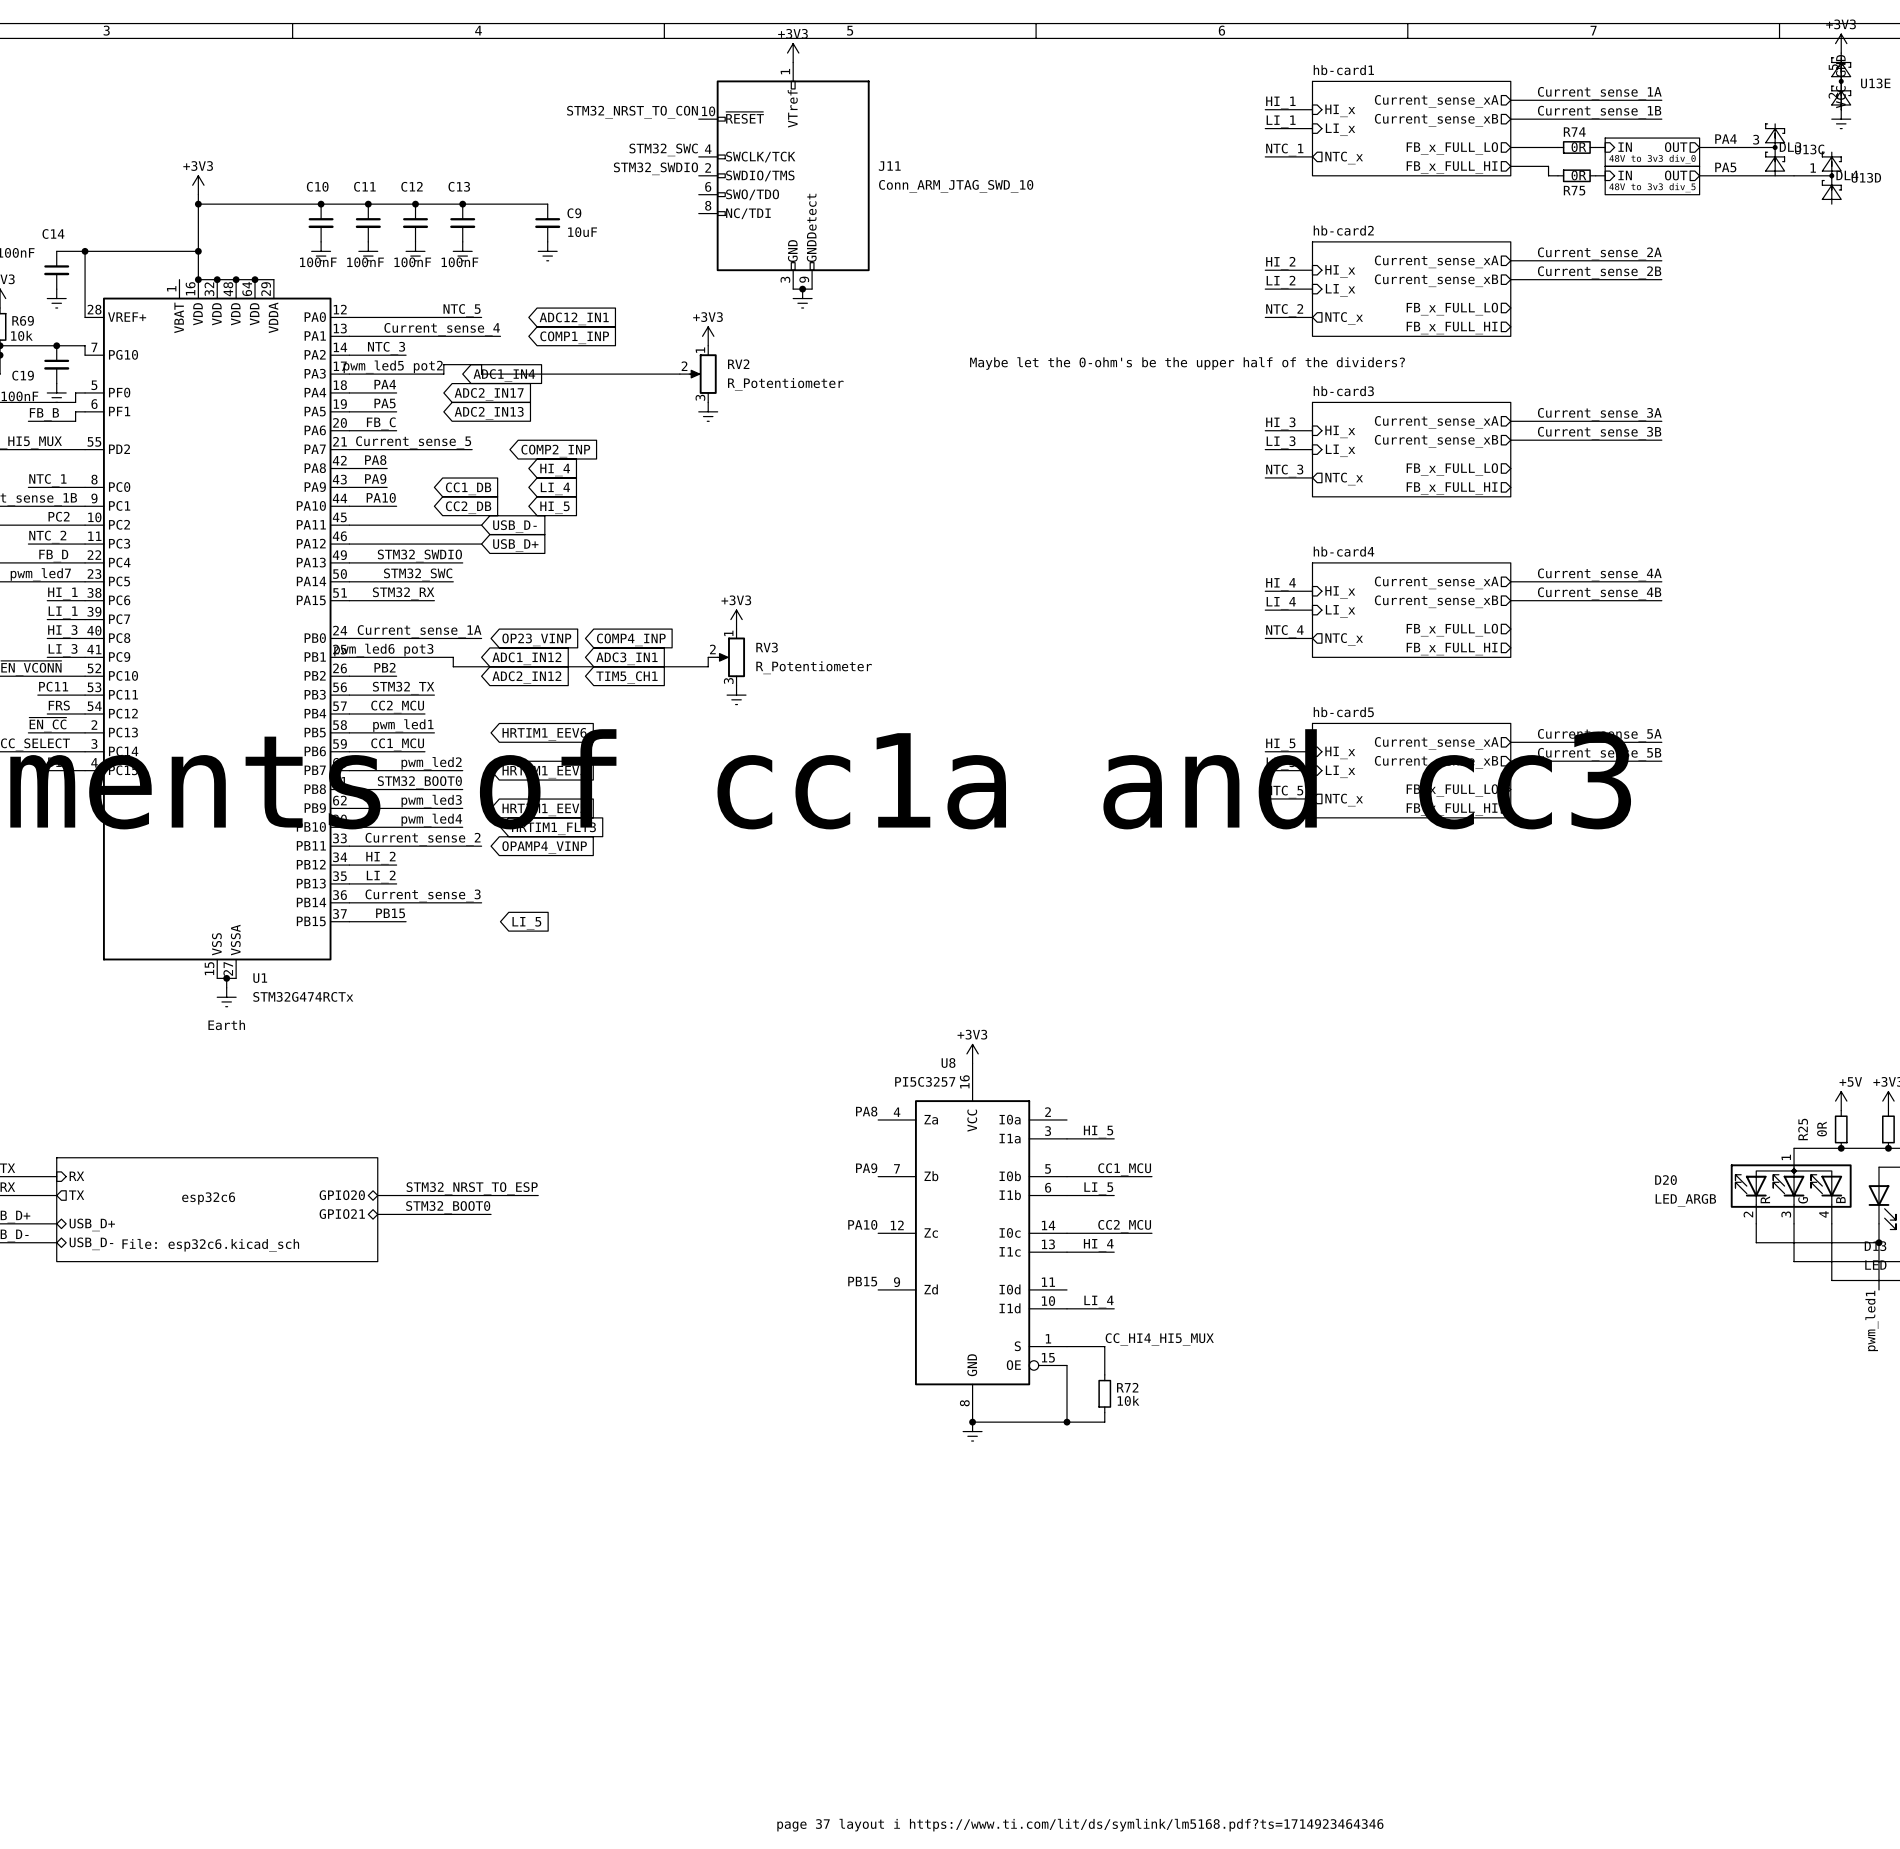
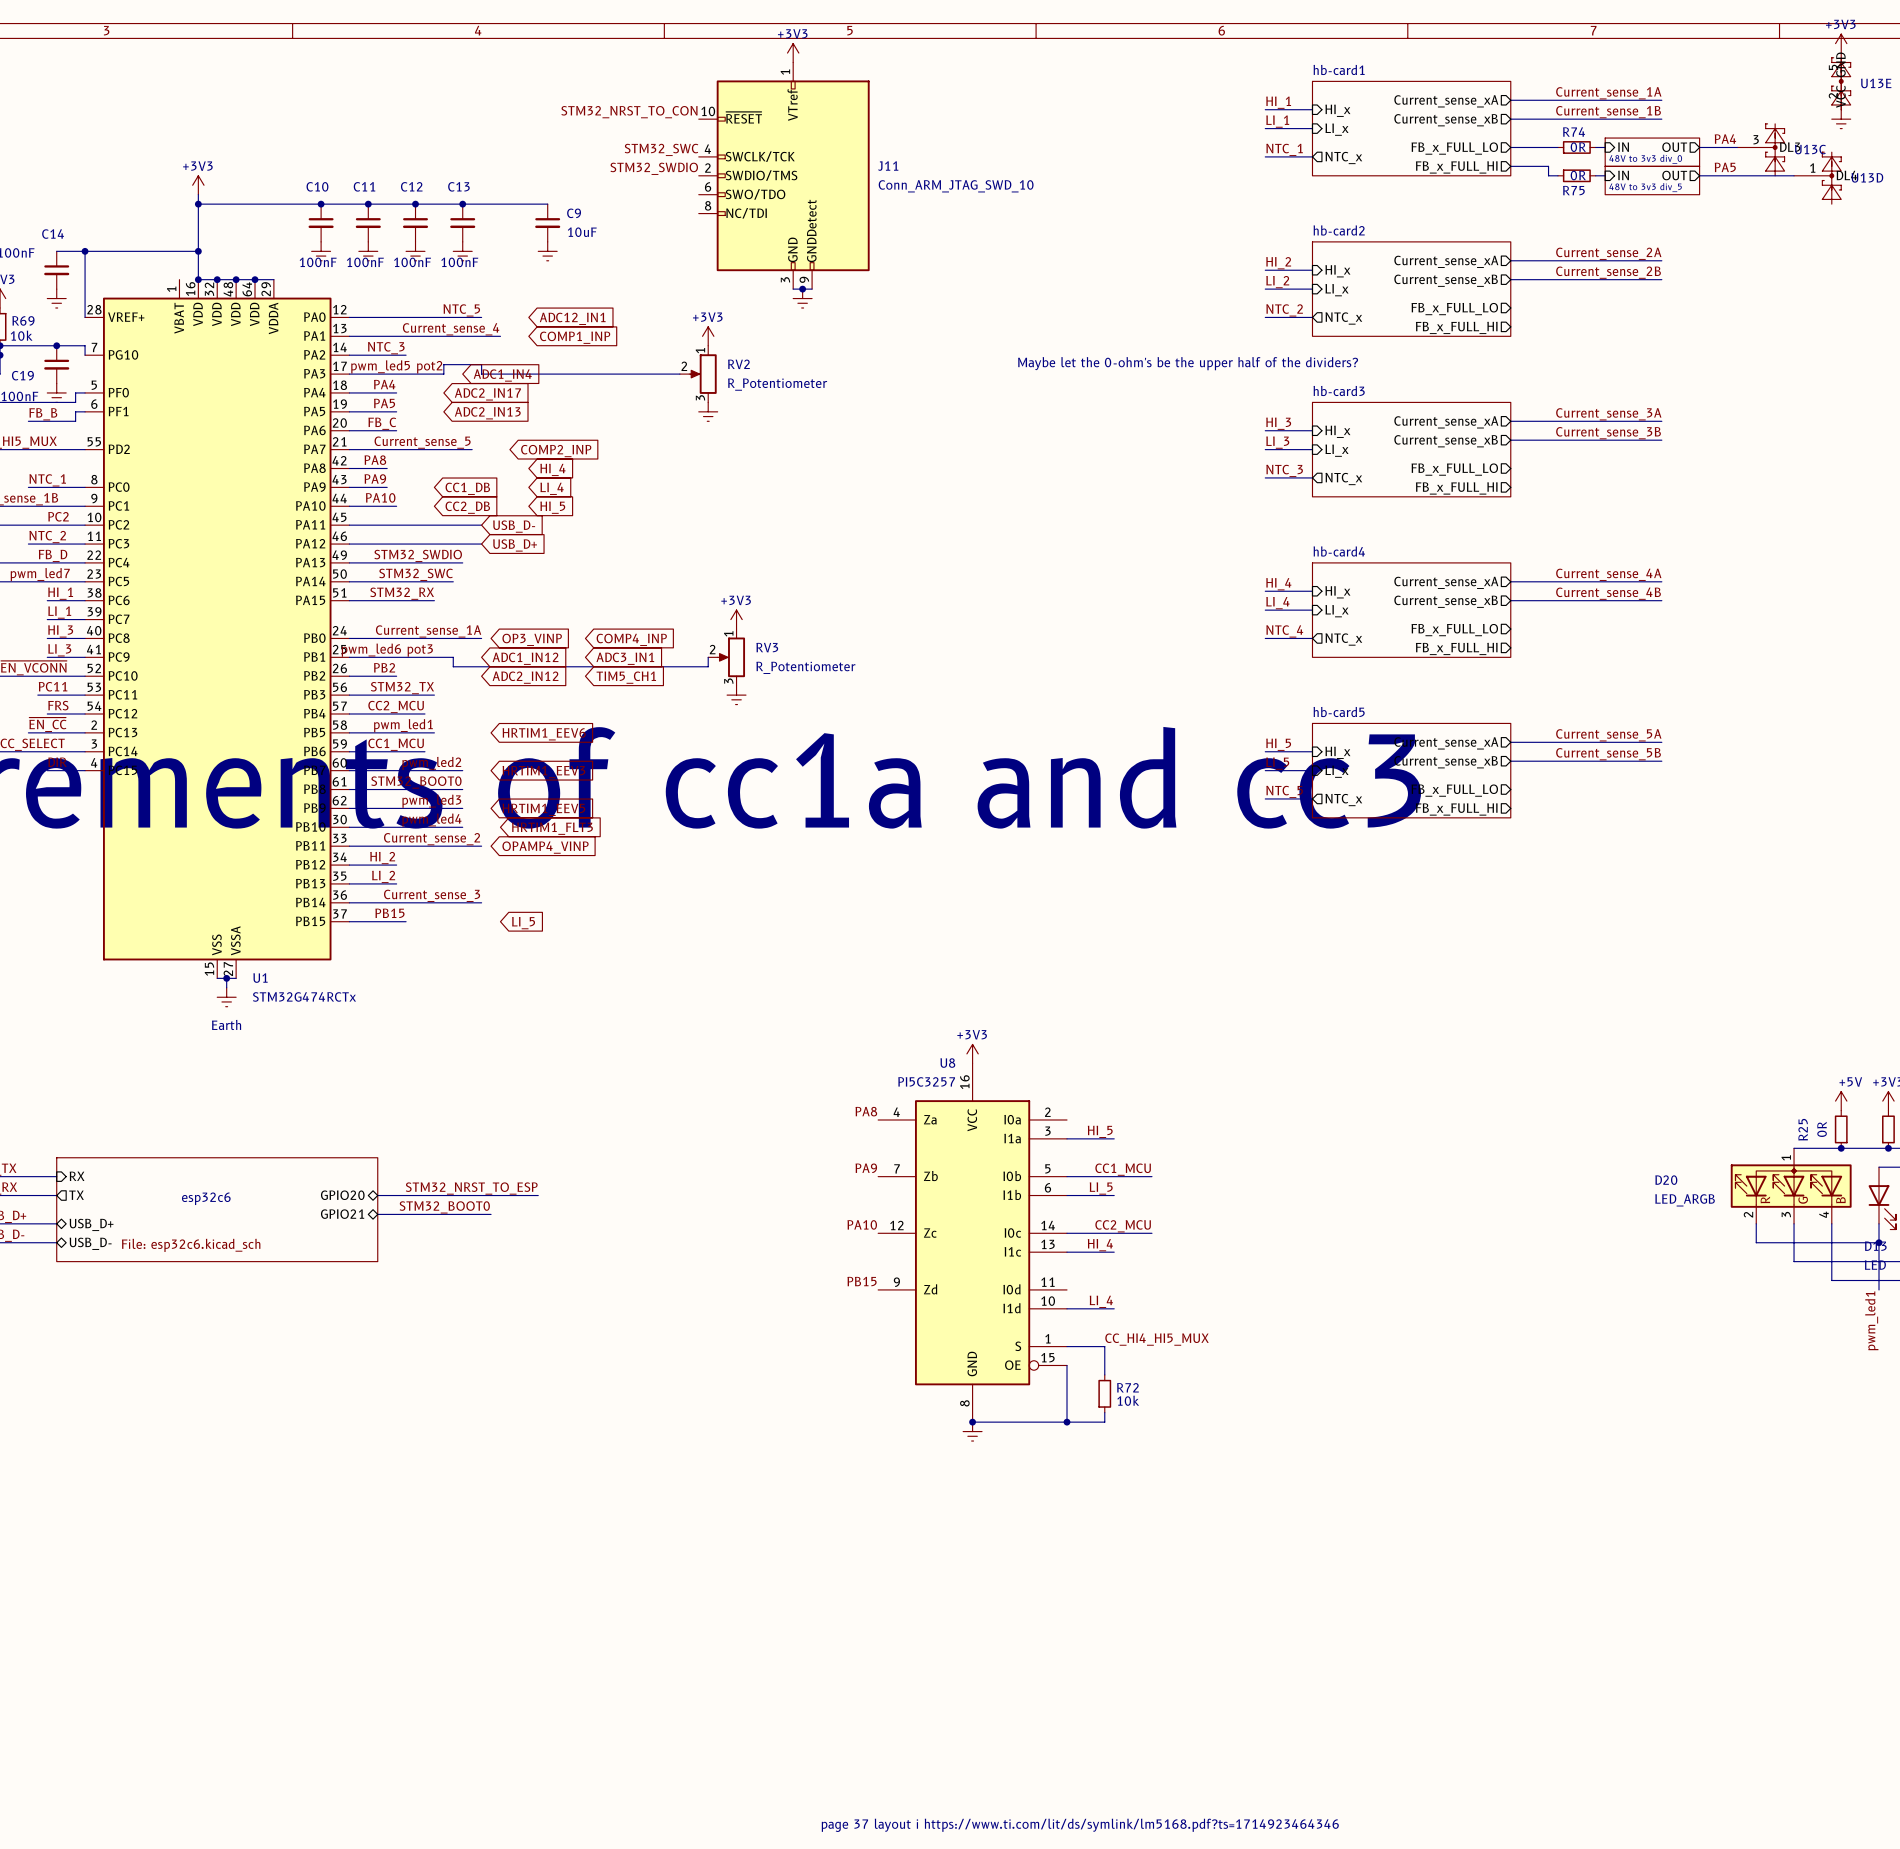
global label: OP23_VINP (536, 639) -> OP3_VINP (532, 639)

